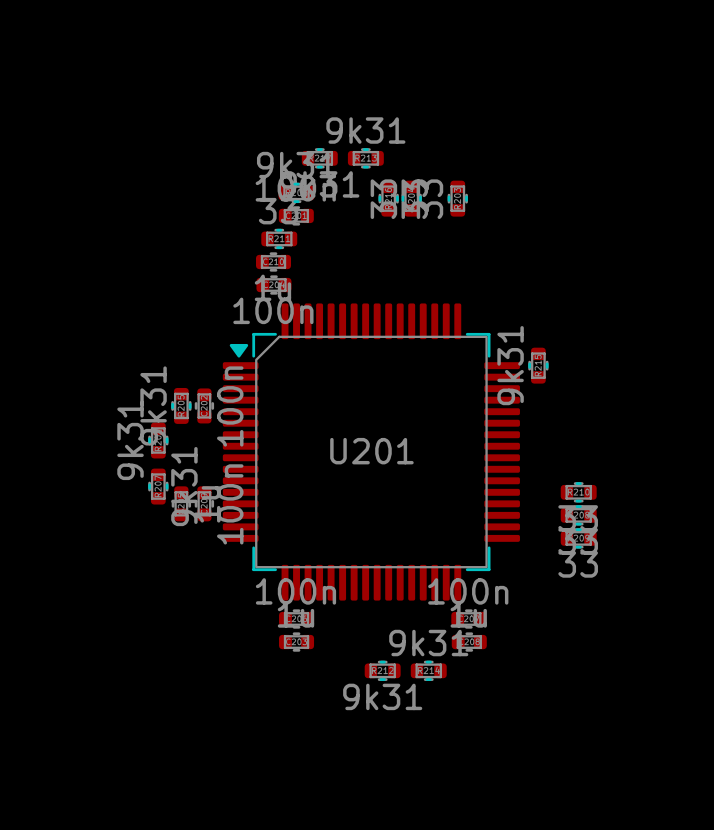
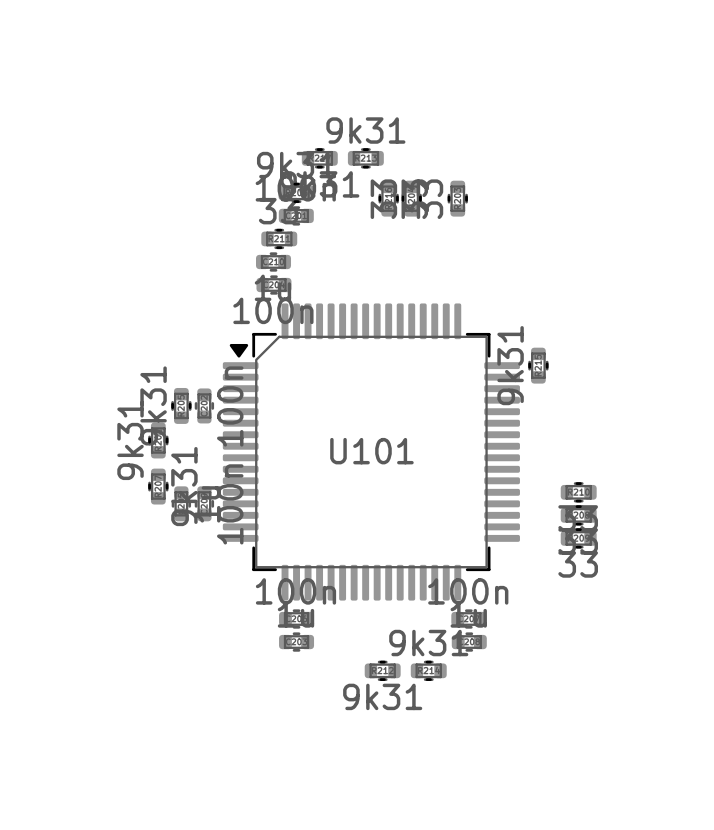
U201 name: U201 (371, 451) -> U101 (371, 451)

